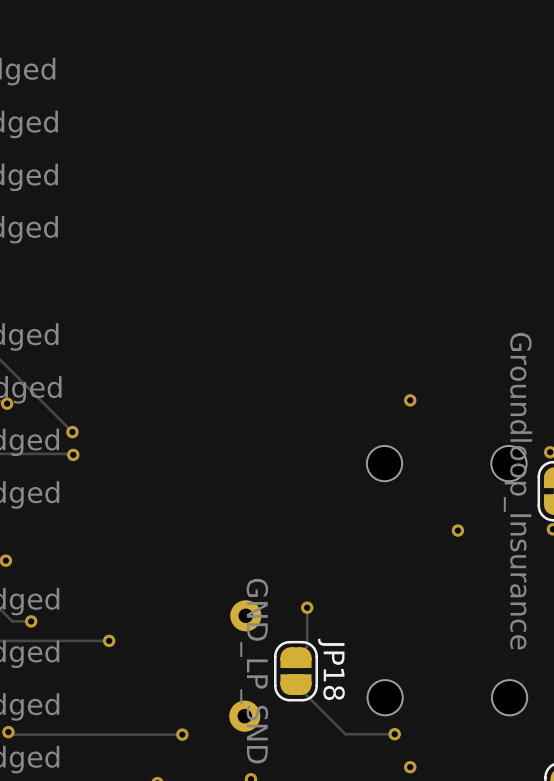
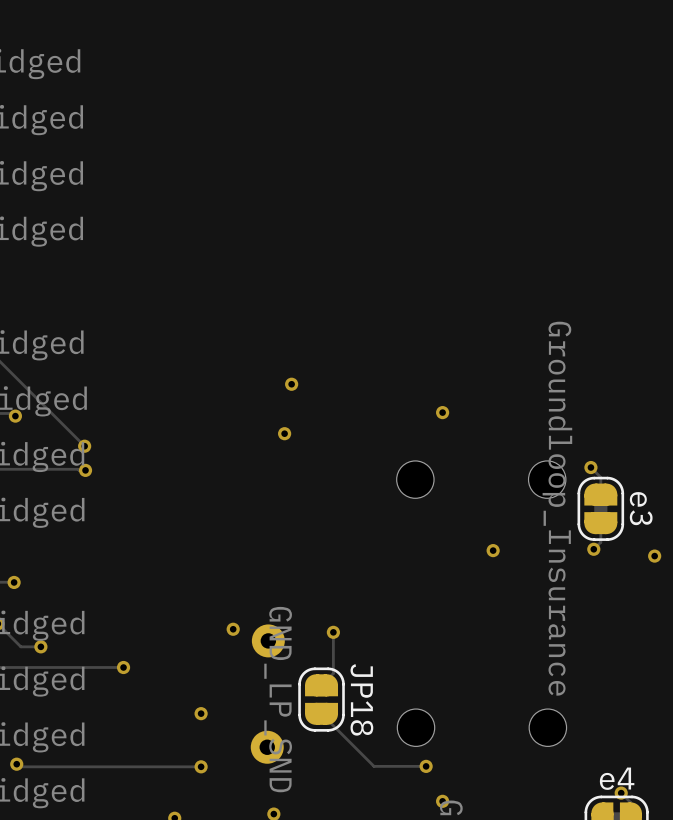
via: none -> (291, 384)
via: none -> (284, 433)
via: none -> (233, 629)
via: none -> (201, 713)

